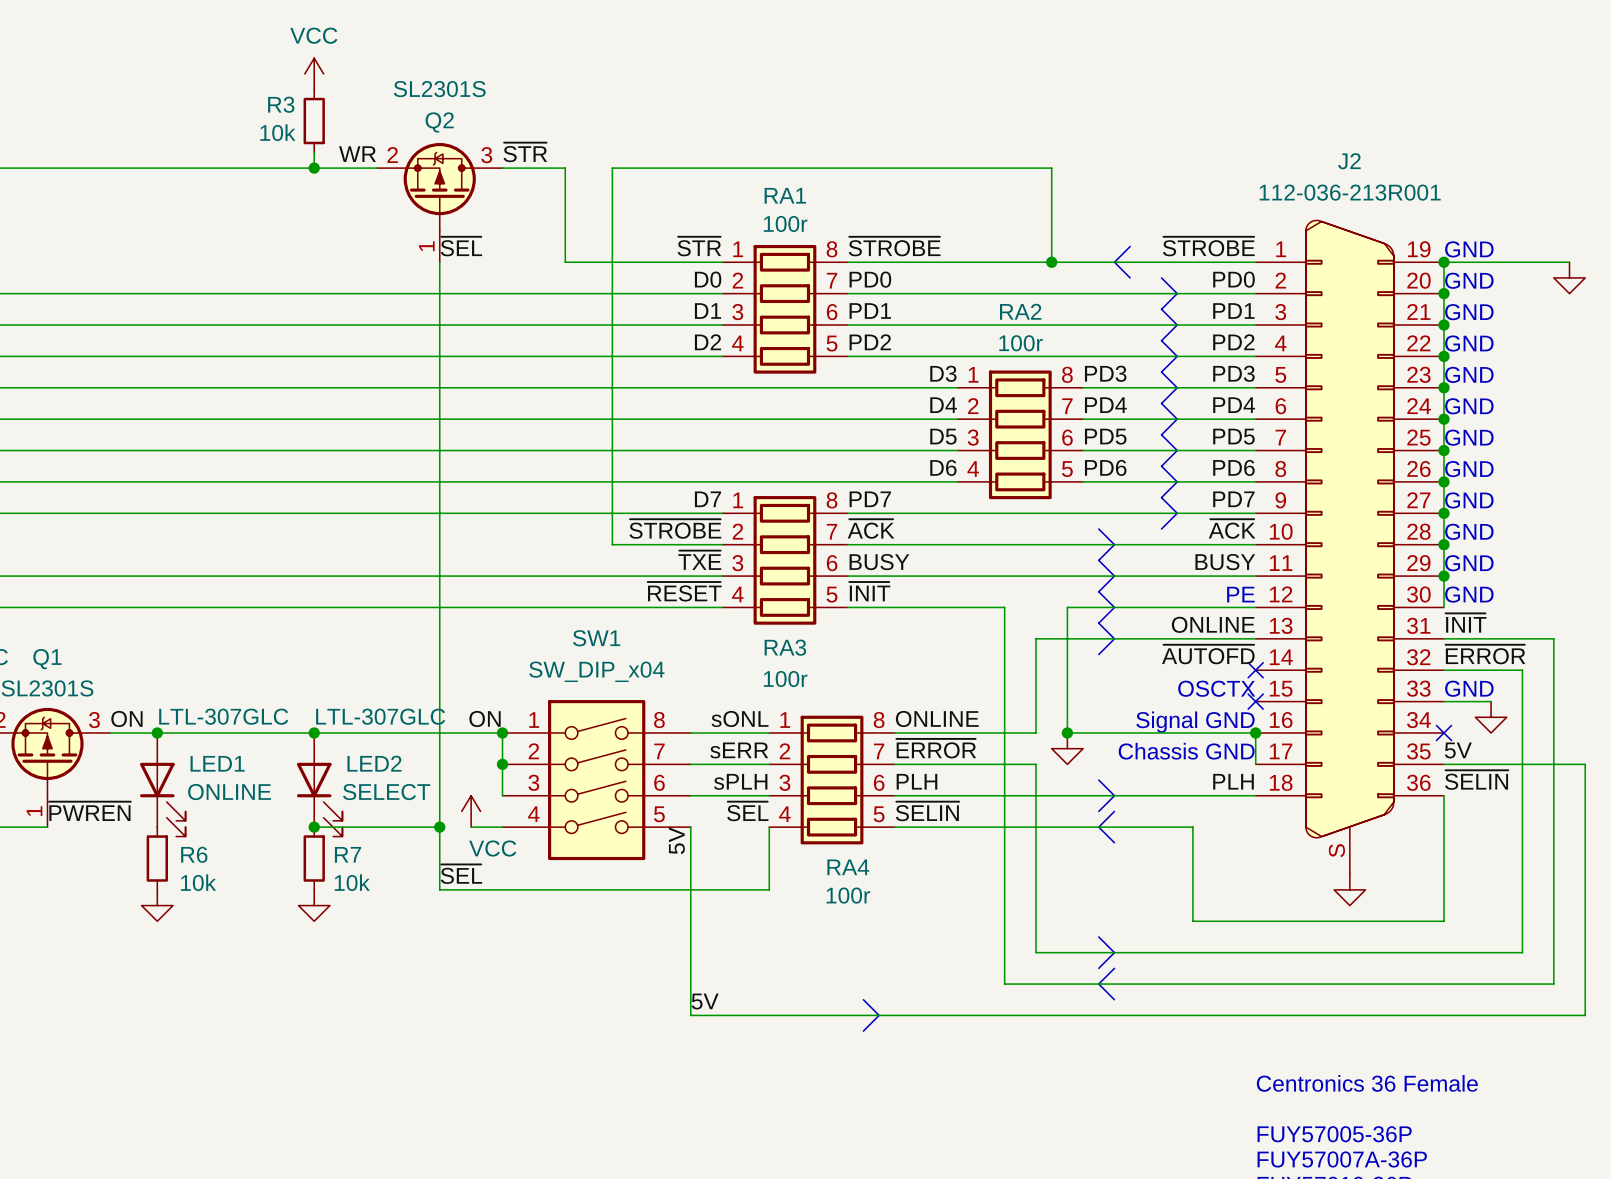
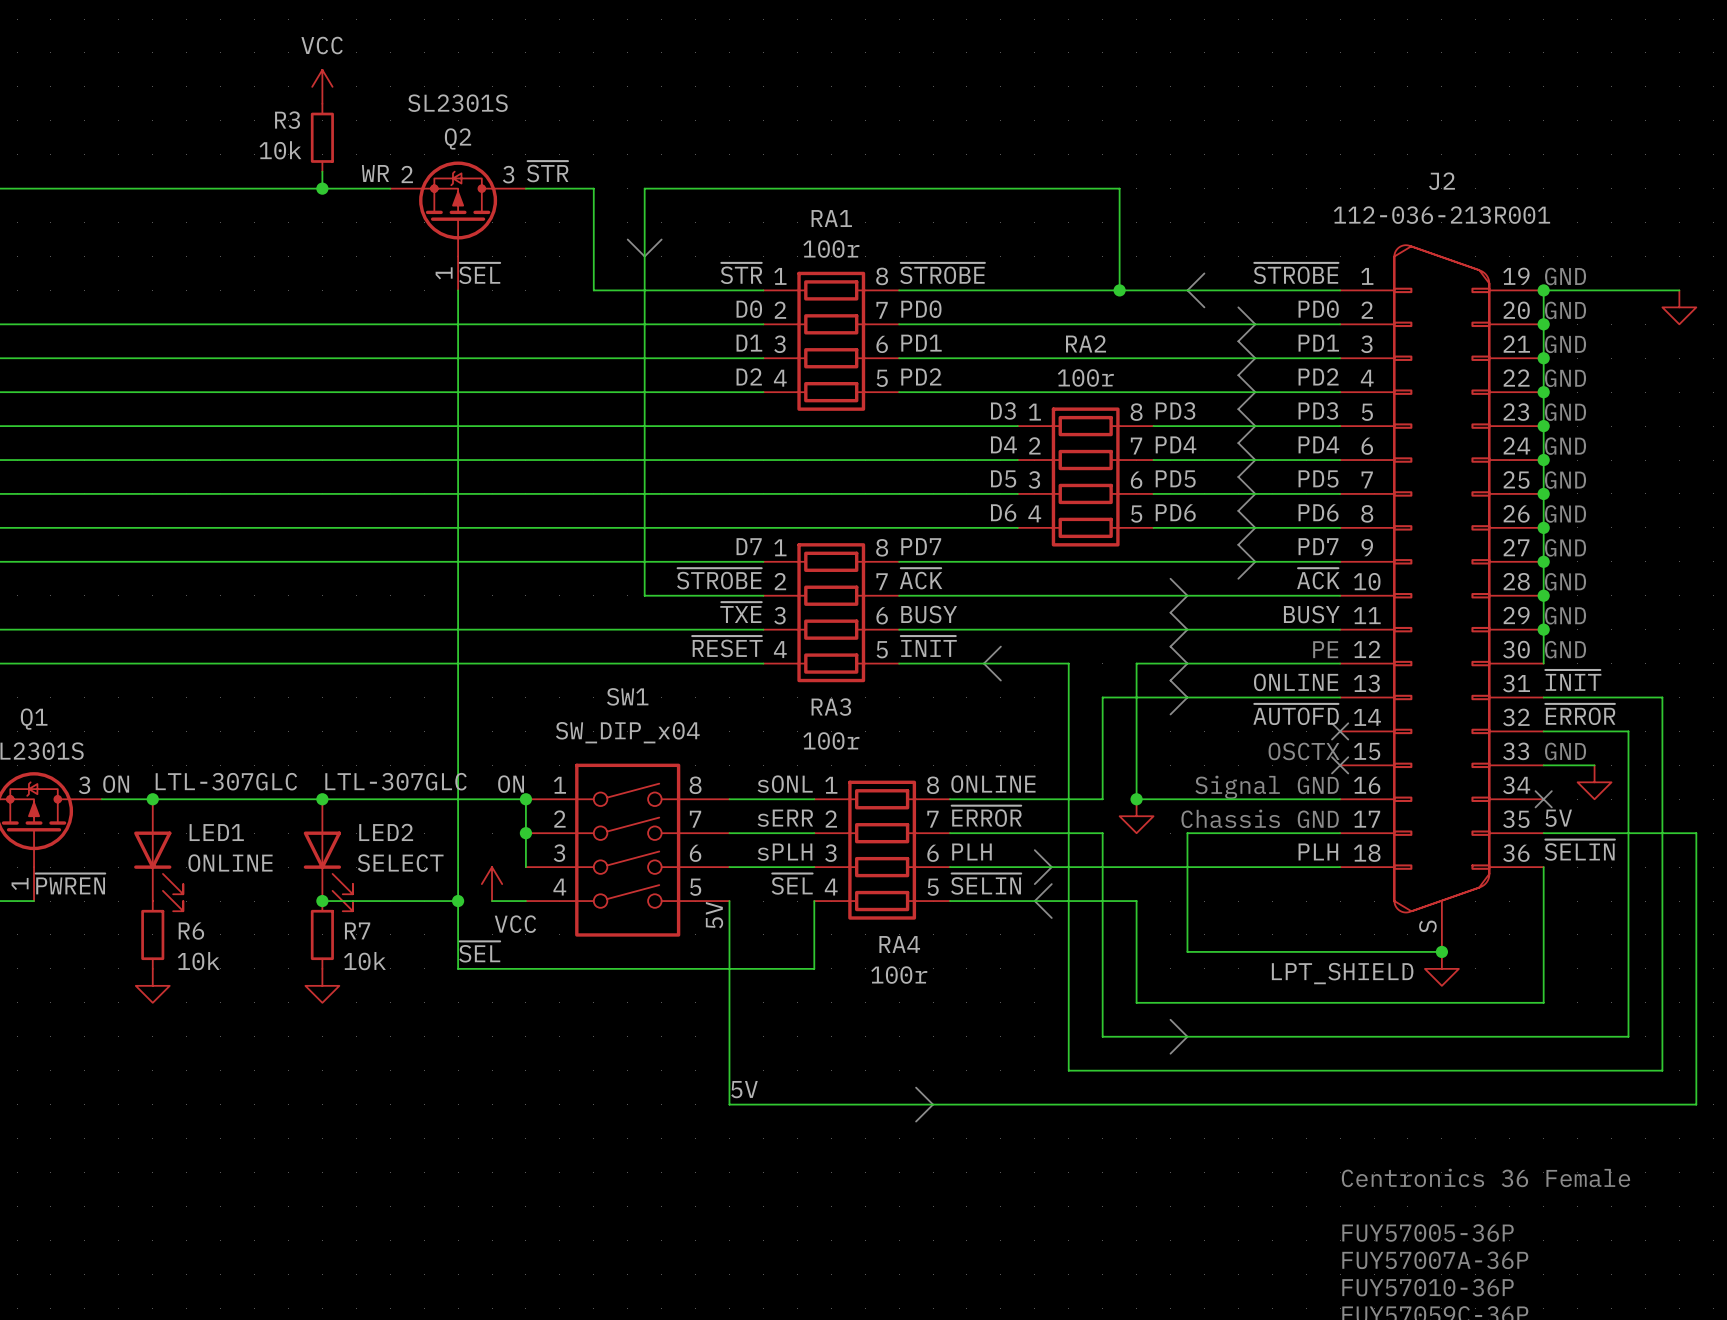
line: none -> (627, 239) (644, 256) (661, 239)
line: none -> (1000, 646) (983, 663) (1000, 680)
wire: (1255, 732) (1255, 764) -> (1441, 951) (1187, 951) (1187, 833) (1340, 833)
junction: (1255, 732) -> none
line: (1098, 780) (1114, 795) (1098, 811) -> (1034, 850) (1051, 867) (1034, 884)
line: (1114, 811) (1098, 827) (1114, 842) -> (1051, 884) (1034, 901) (1051, 918)
wire: (1067, 827) (1192, 827) (1192, 921) -> (1136, 901) (1136, 1002) (1272, 1002)
junction: none -> (1441, 951)
power symbol text: none -> LPT_SHIELD (1342, 973)
line: (1114, 968) (1098, 984) (1114, 999) -> none

